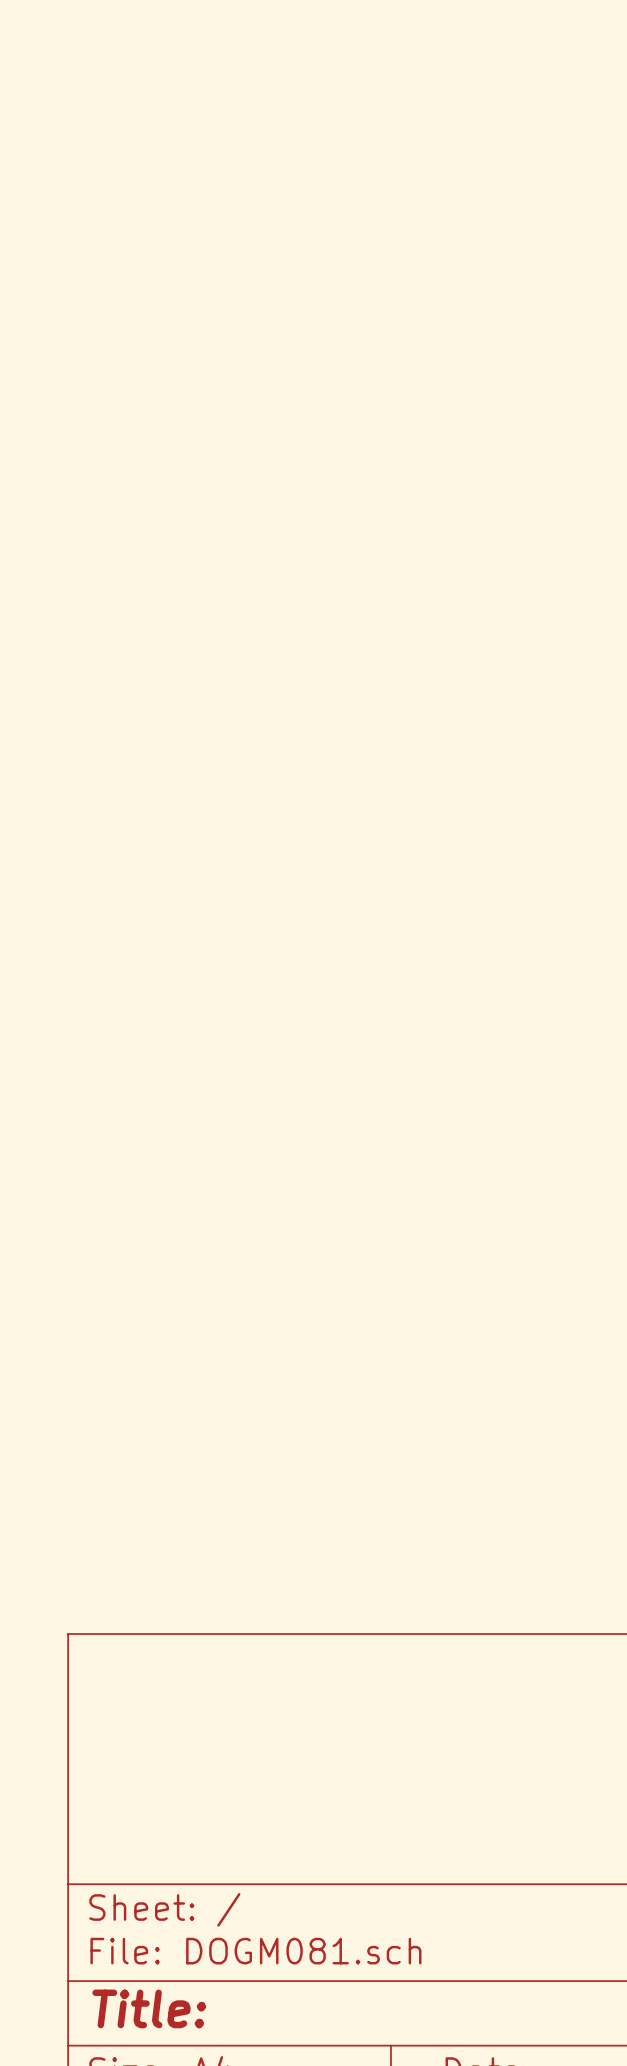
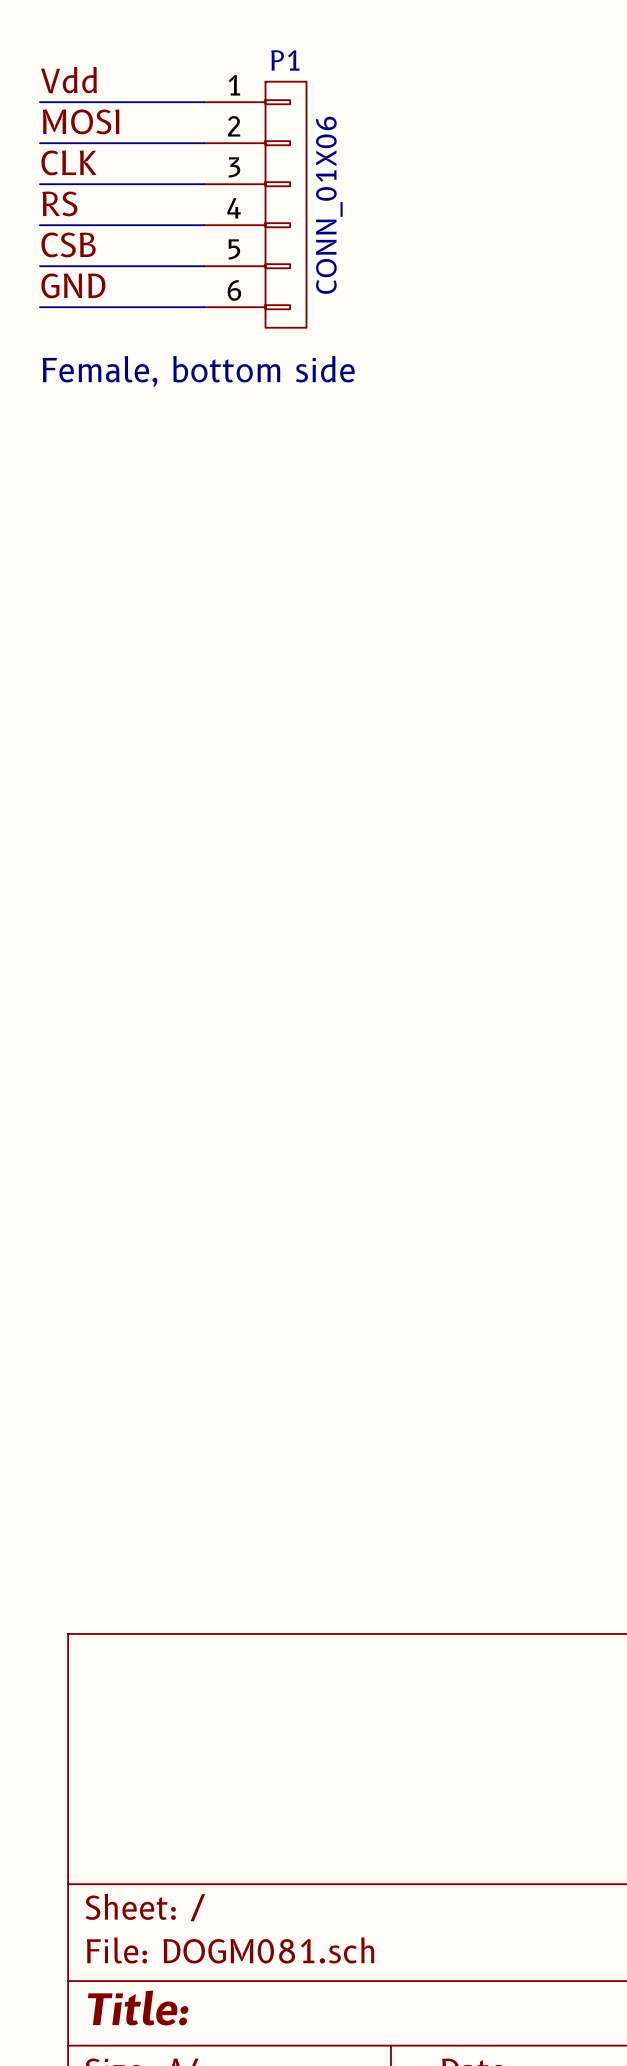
label: none -> Vdd (69, 80)
wire: none -> (39, 102) (204, 102)
label: none -> MOSI (81, 121)
wire: none -> (39, 143) (204, 143)
label: none -> CLK (68, 162)
wire: none -> (39, 184) (204, 184)
label: none -> RS (59, 203)
P1: none -> CONN_01X06 (255, 204)
wire: none -> (39, 225) (204, 225)
label: none -> CSB (68, 244)
wire: none -> (39, 266) (204, 266)
label: none -> GND (73, 285)
wire: none -> (39, 307) (204, 307)
text: none -> Female, bottom side (198, 371)

